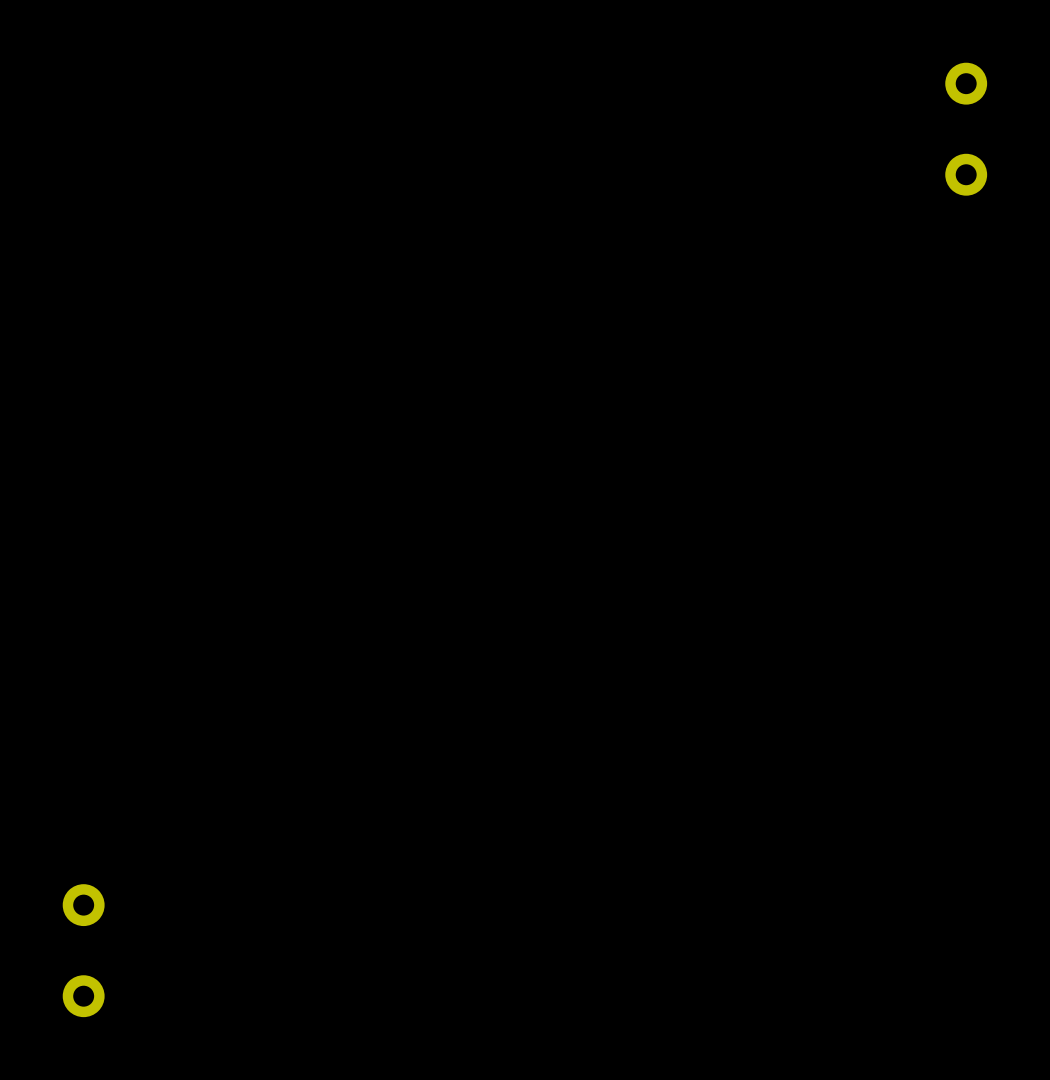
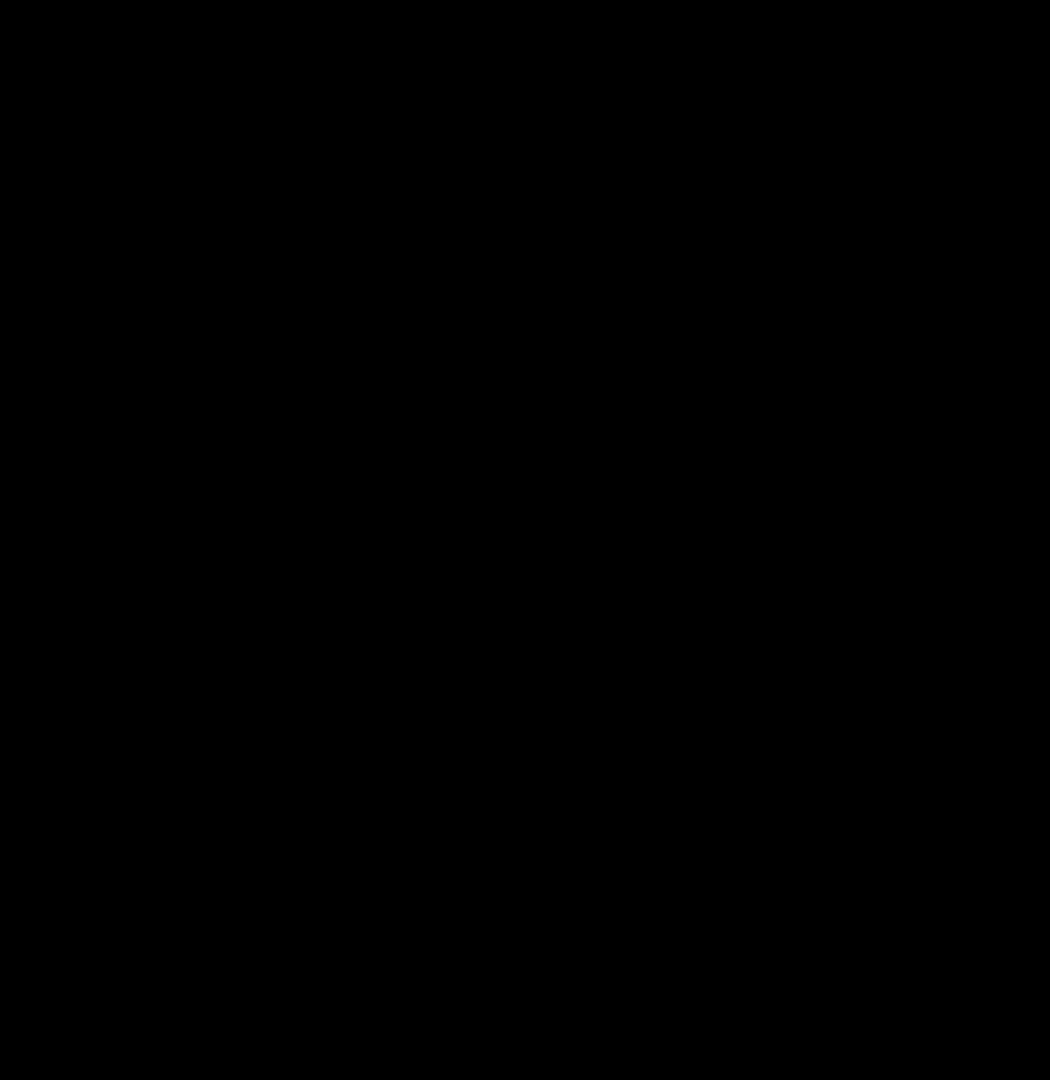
part: (966, 83) -> none
part: (966, 174) -> none
part: (83, 905) -> none
part: (83, 996) -> none

